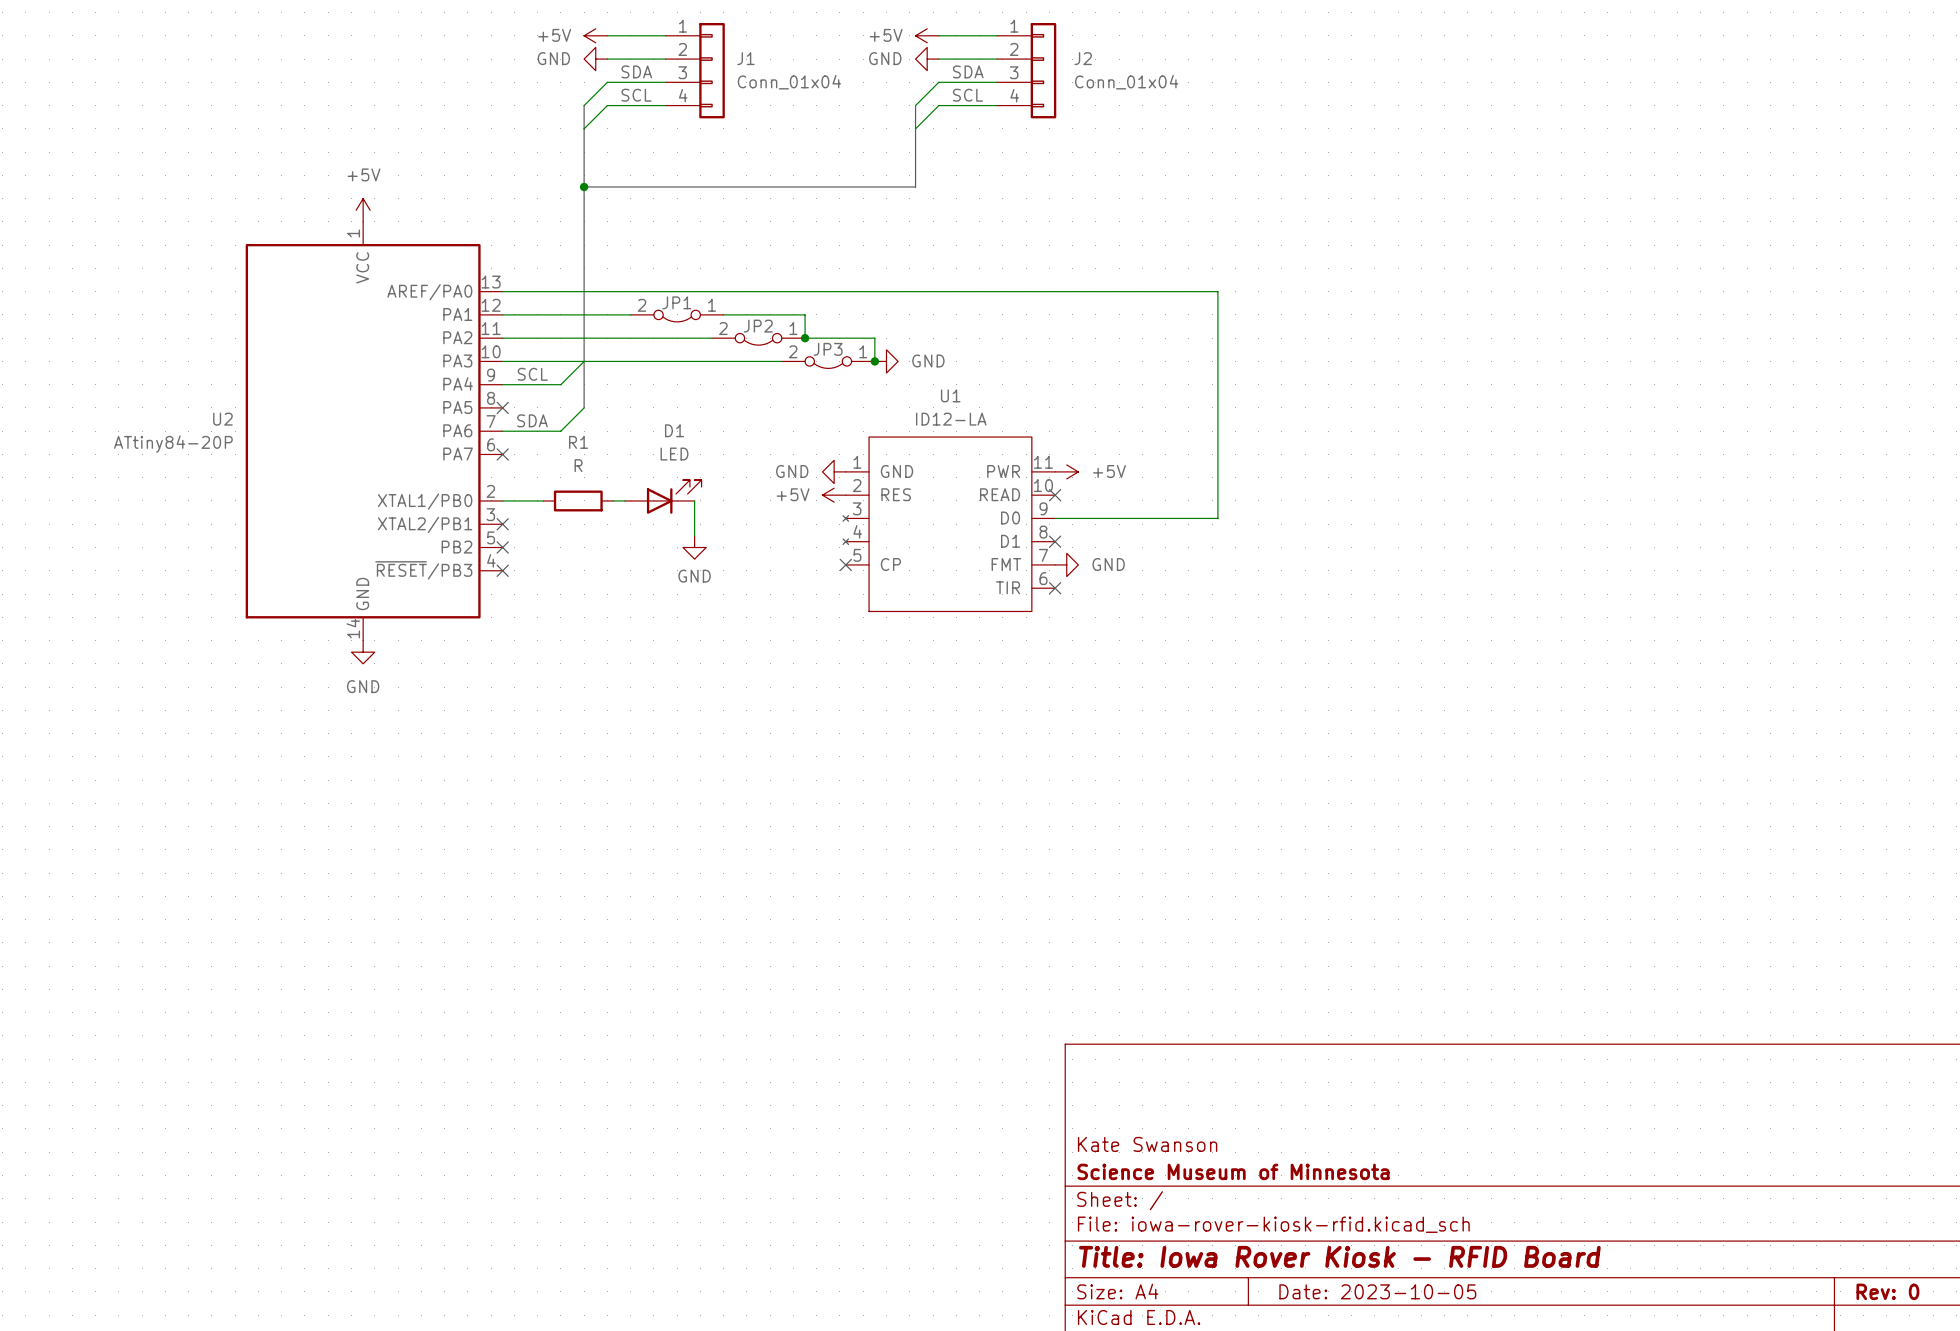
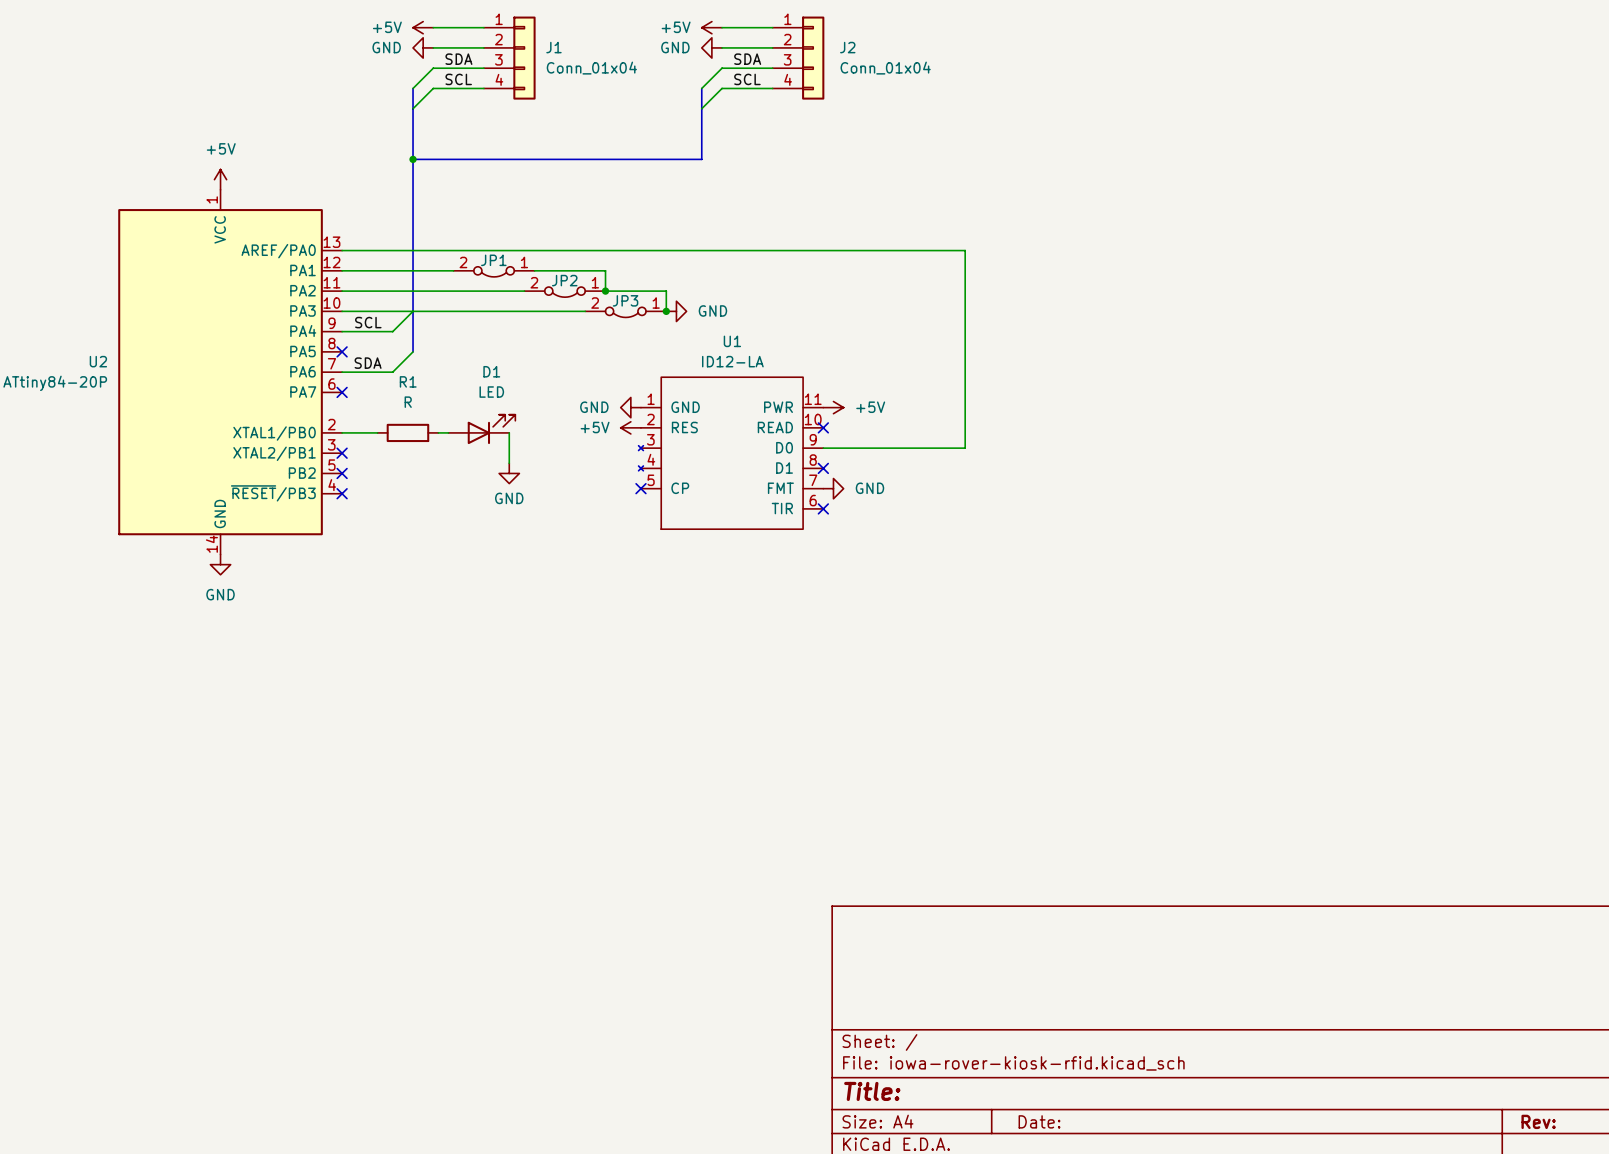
title block: Kate Swanson (1147, 1144) -> none
title block: Science Museum of Minnesota (1233, 1171) -> none
title block: Title: Iowa Rover Kiosk - RFID Board (1339, 1256) -> Title: (872, 1091)
title block: Date: 2023-10-05 (1377, 1291) -> Date: (1039, 1121)
title block: Rev: 0 (1887, 1291) -> Rev: (1538, 1121)

